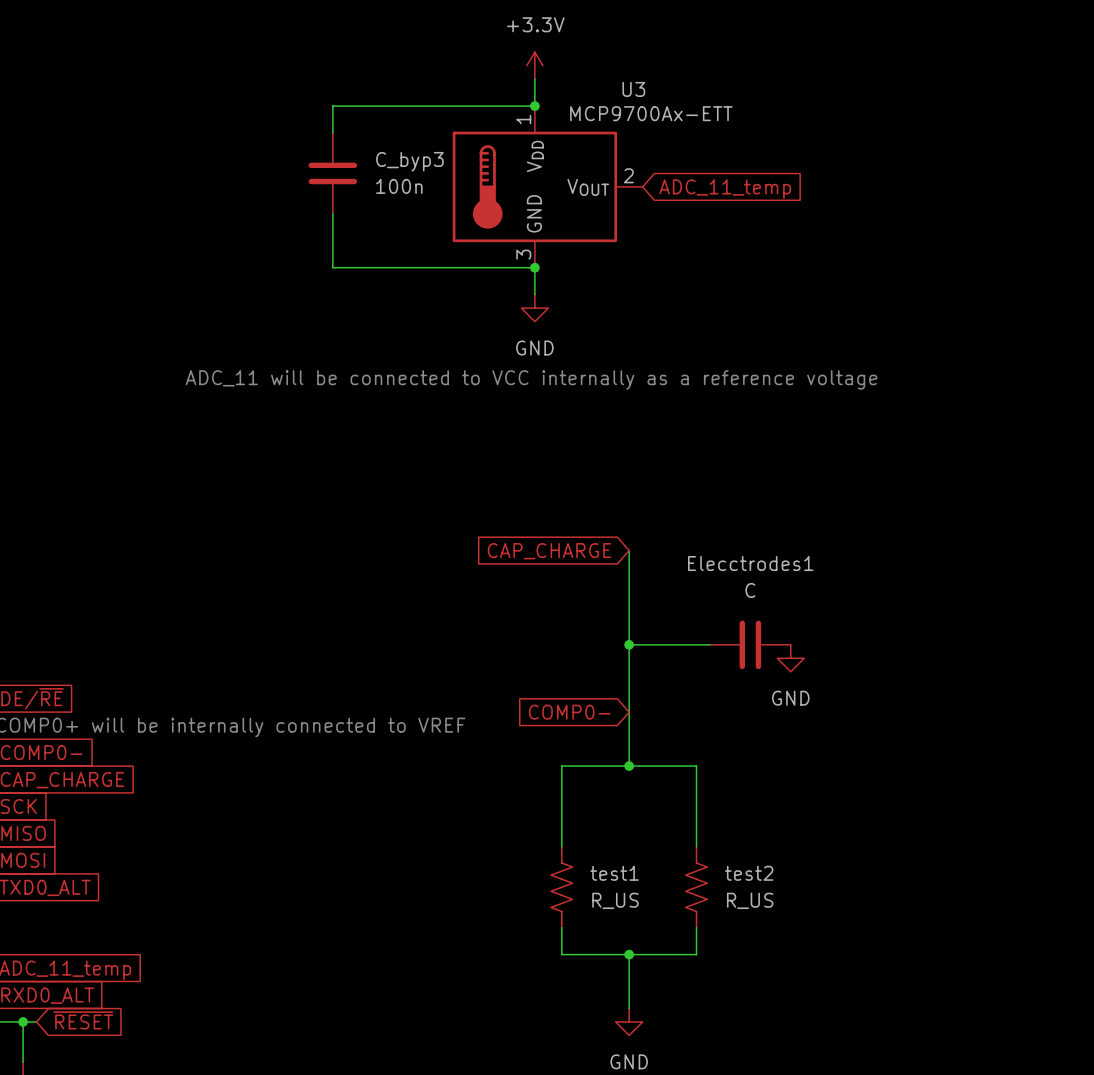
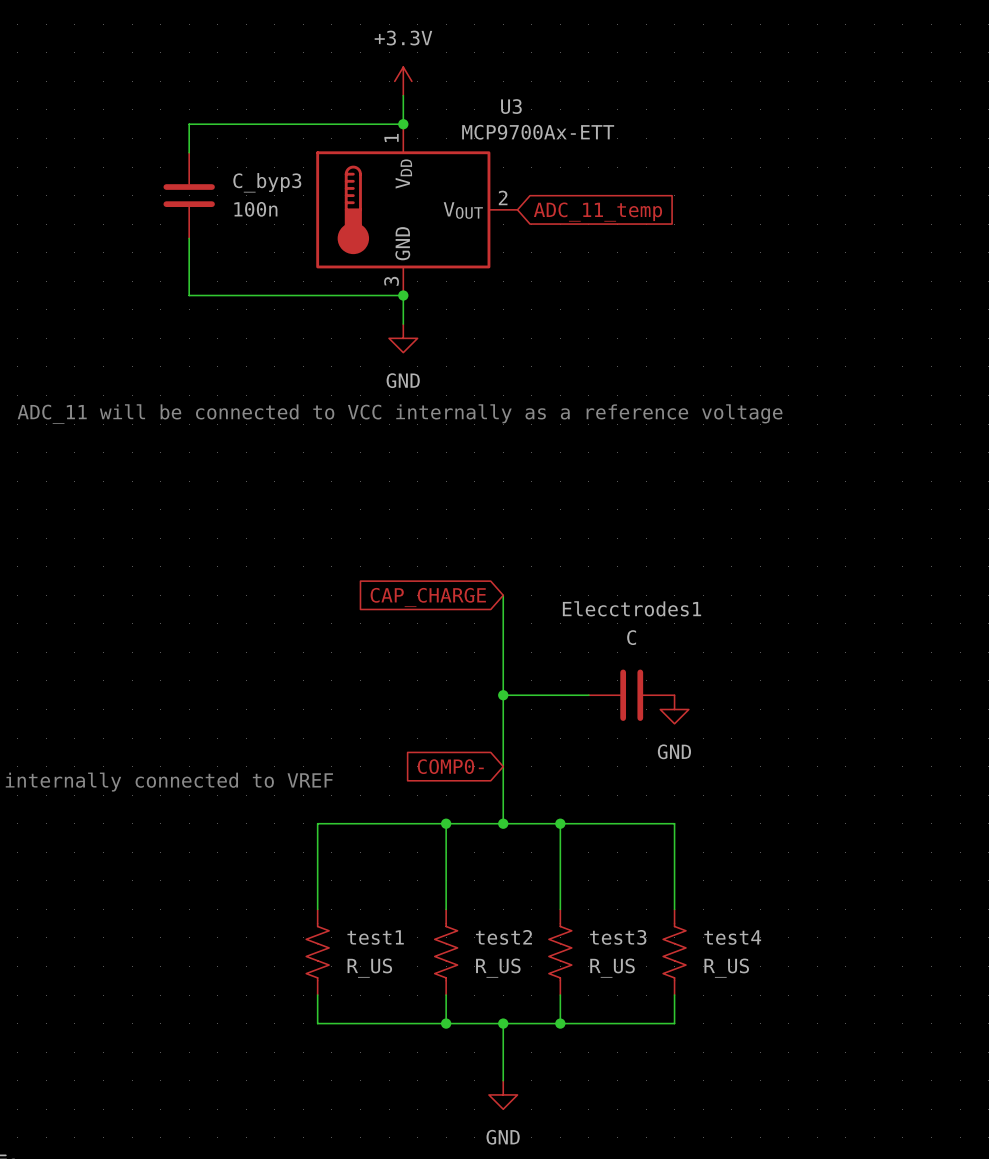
wire: (561, 766) (561, 846) -> (431, 823) (317, 823) (317, 909)
wire: none -> (446, 823) (446, 909)
junction: none -> (446, 823)
wire: none -> (560, 823) (560, 909)
junction: none -> (560, 823)
wire: (696, 766) (696, 846) -> (574, 823) (674, 823) (674, 909)
test1 position: (561, 887) -> (317, 952)
test3: none -> R_US (560, 952)
test2 position: (696, 887) -> (446, 952)
test4: none -> R_US (674, 952)
wire: (561, 927) (561, 954) -> (317, 995) (317, 1023) (431, 1023)
wire: none -> (446, 995) (446, 1023)
wire: none -> (560, 995) (560, 1023)
wire: (696, 927) (696, 954) -> (674, 995) (674, 1023) (574, 1023)
junction: none -> (446, 1023)
junction: none -> (560, 1023)

